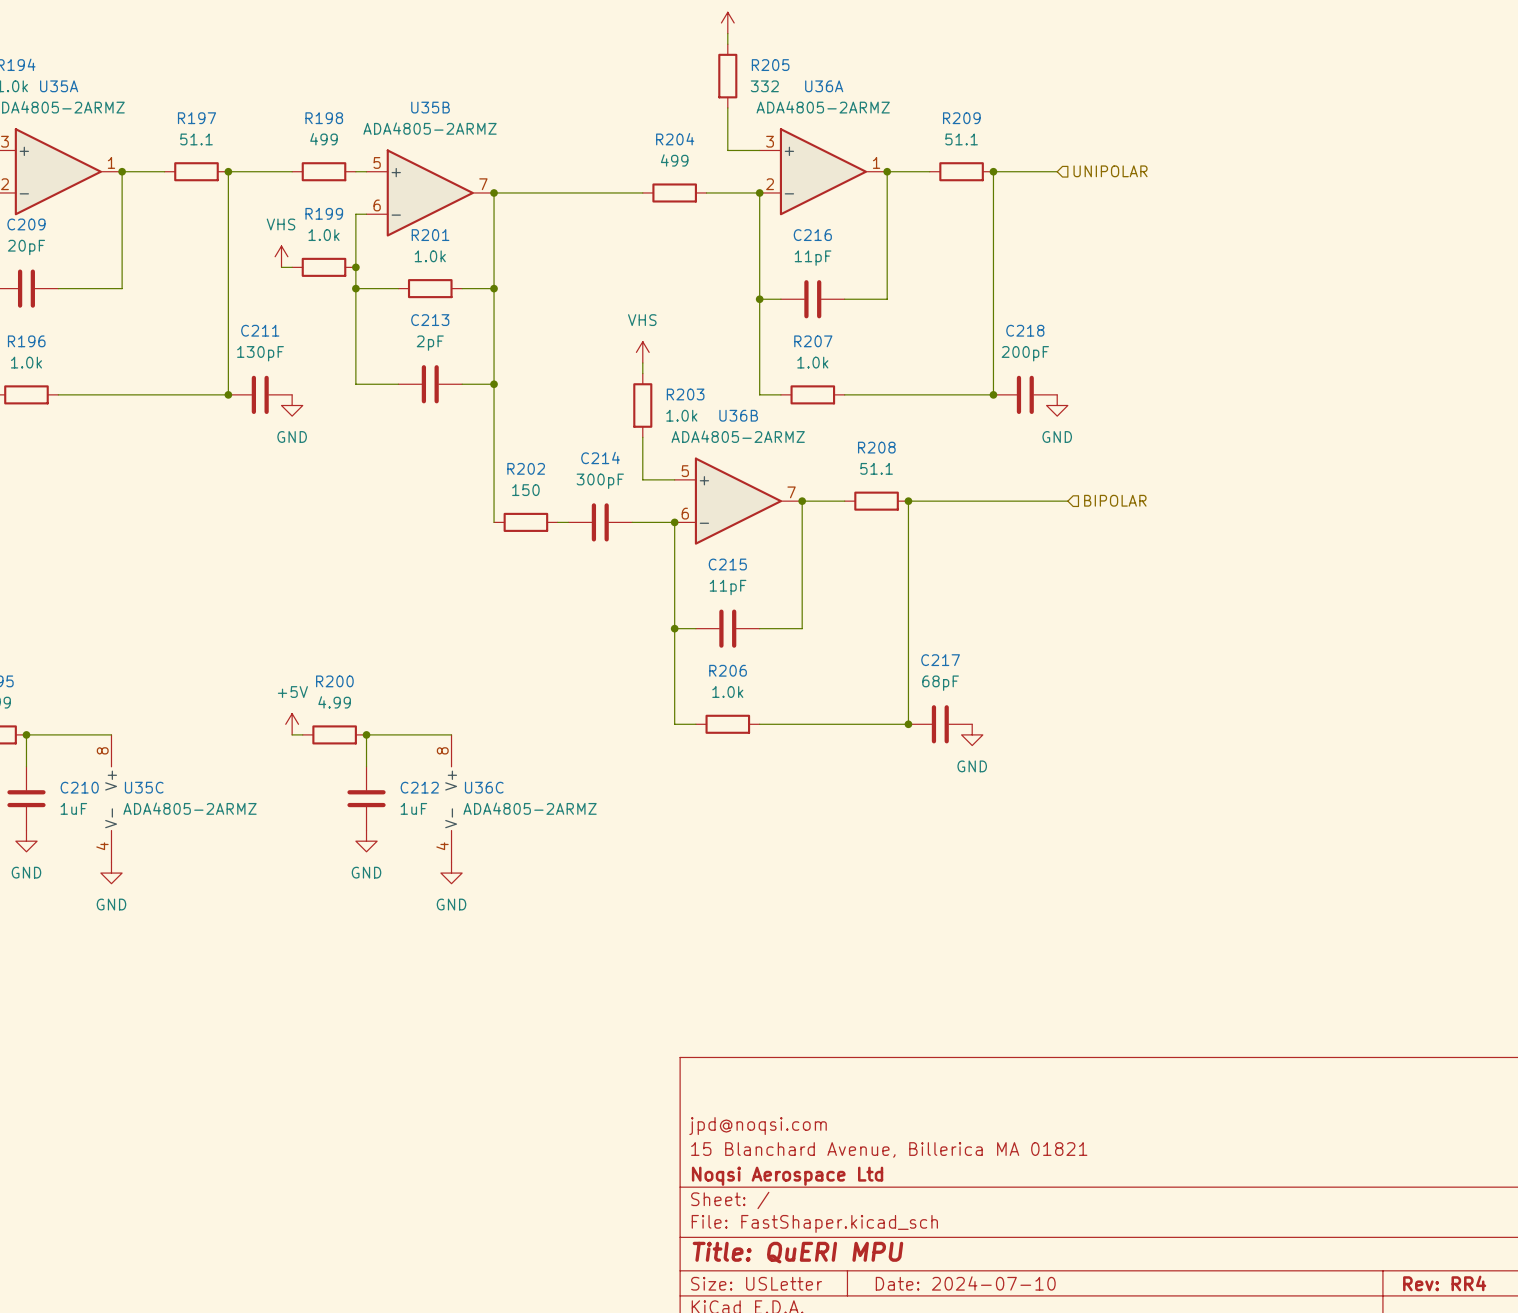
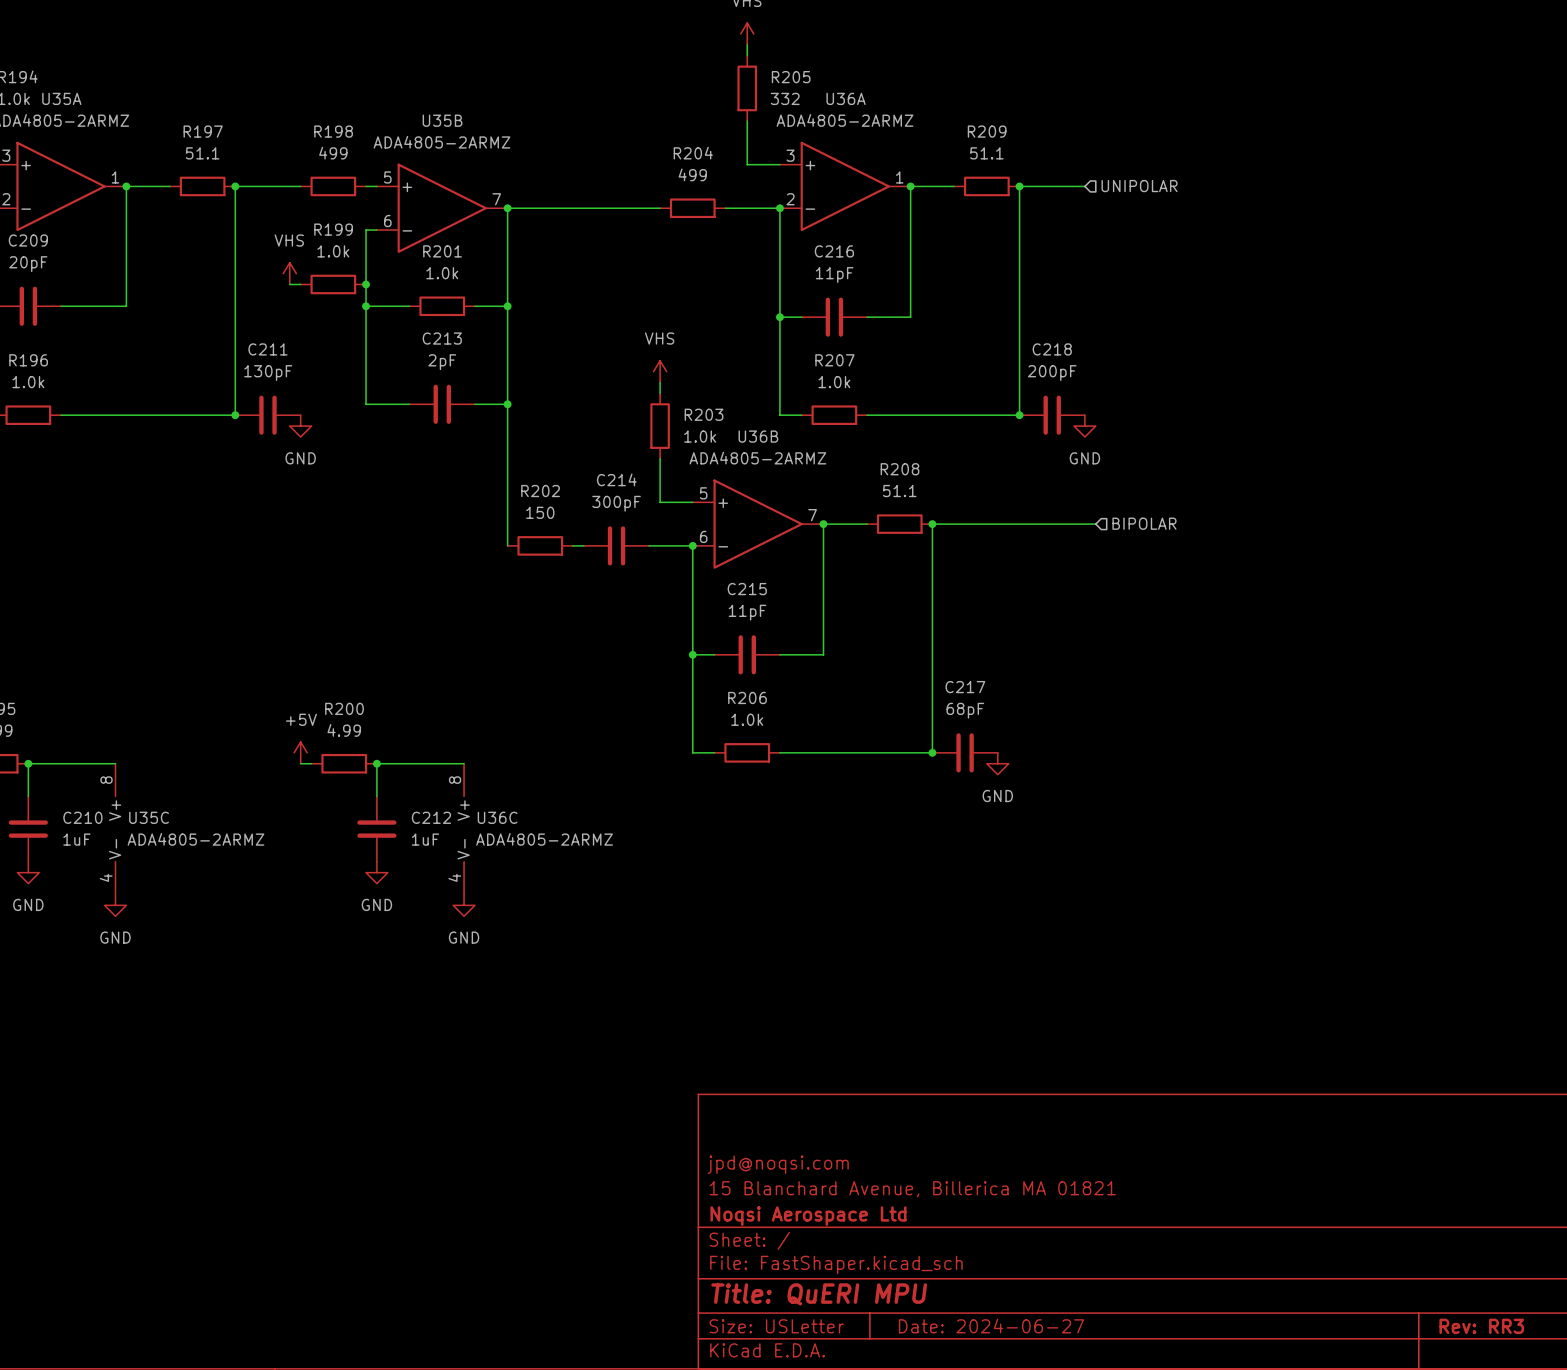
title block: Date: 2024-07-10 (965, 1283) -> Date: 2024-06-27 (991, 1326)
title block: Rev: RR4 (1444, 1283) -> Rev: RR3 (1481, 1326)

